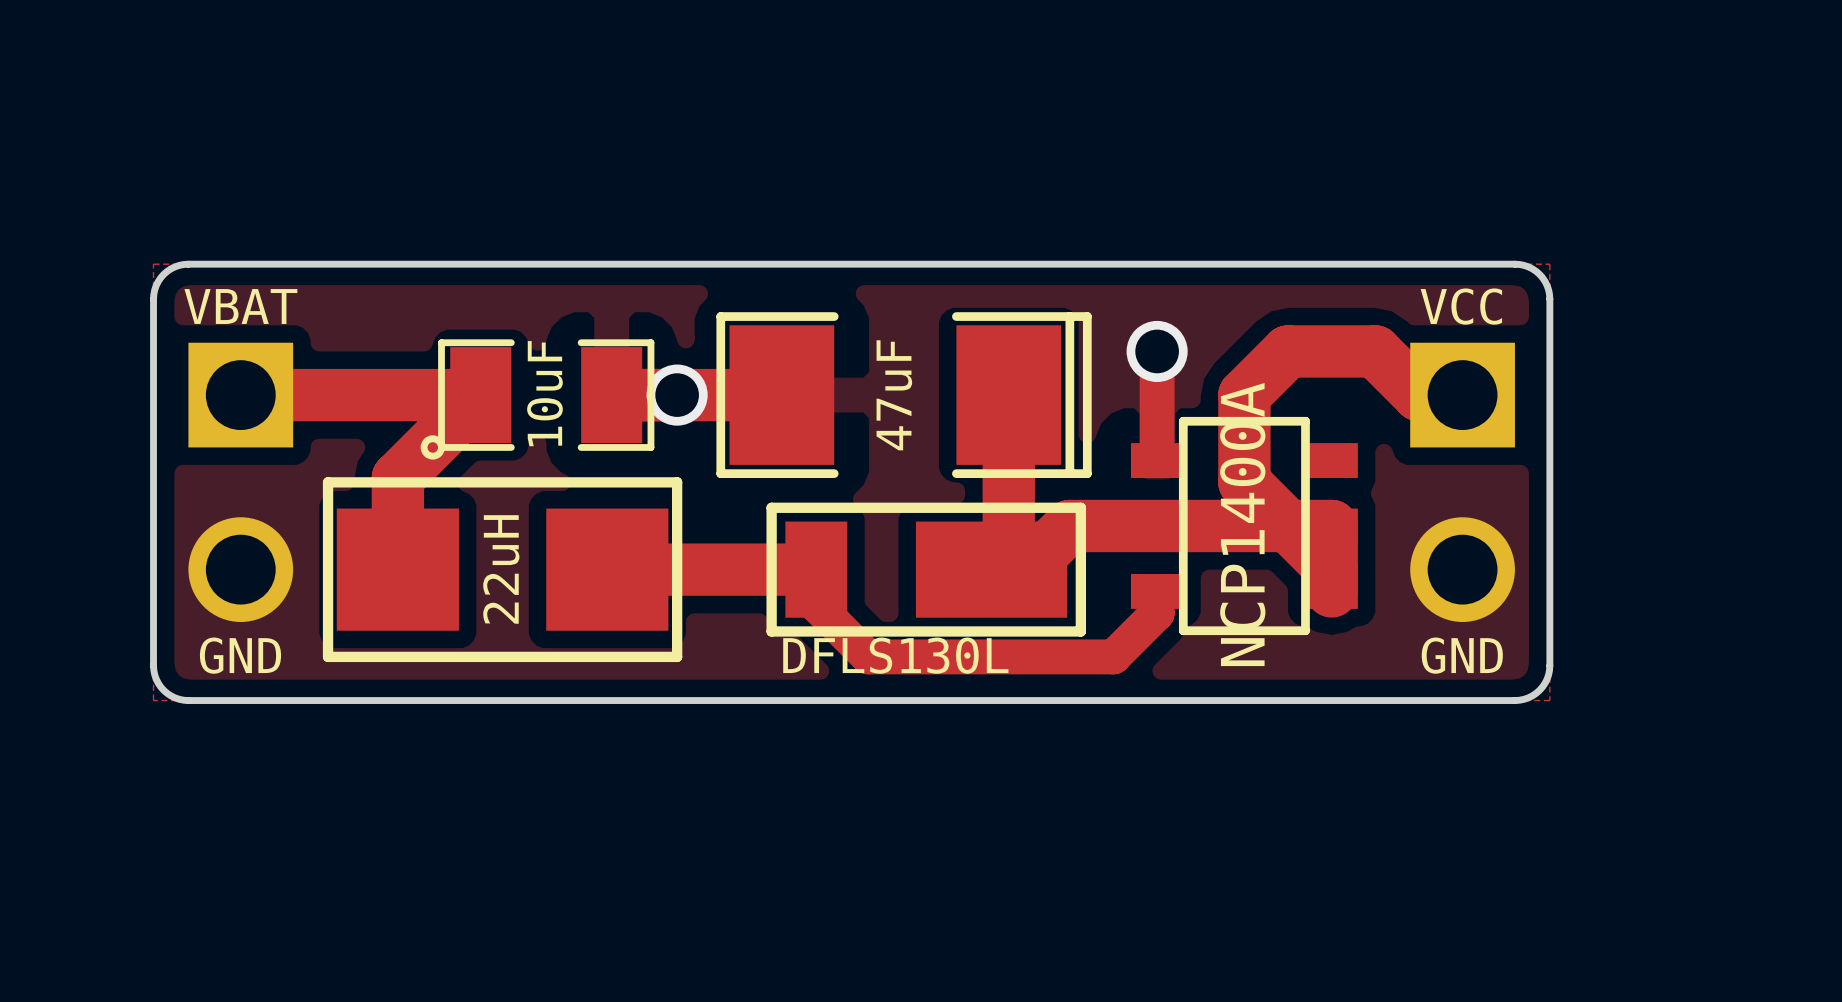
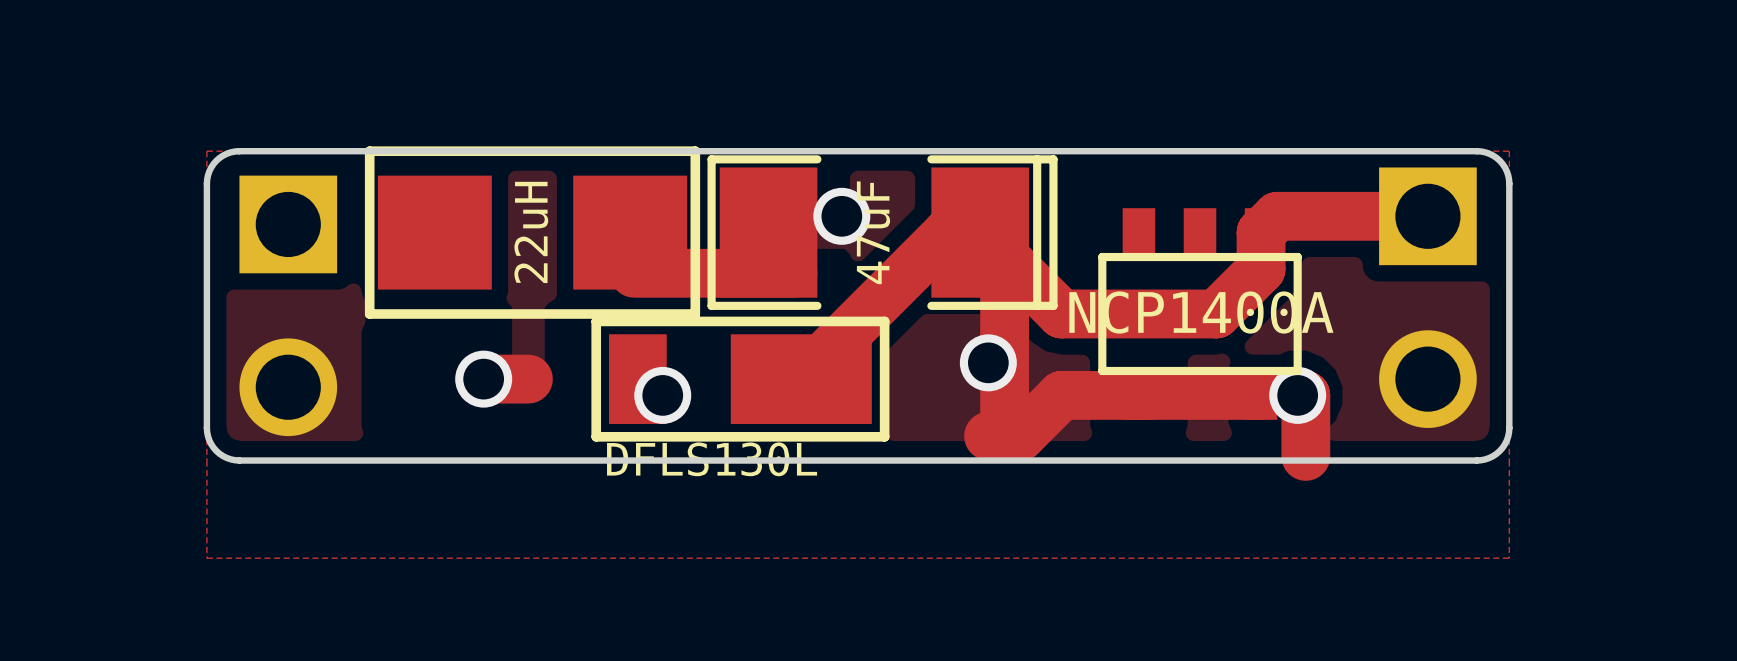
text: VBAT (240, 306) -> none
text: VCC (1461, 306) -> none
via: none -> (841, 216)
track: none -> (1427, 216) (1277, 216) (1261, 232) (1261, 269) (1216, 314) (1061, 314) (980, 232) (947, 232) (801, 379)
part footprint: [420, 339, 655, 460] -> [364, 146, 701, 319]
track: (1157, 351) (1157, 460) -> none
via: (1157, 351) -> none
part value: 10uF (544, 393) -> 22uH (531, 232)
track: (240, 395) (480, 395) (397, 478) (397, 569) -> none
via: (677, 395) -> none
part position: (904, 395) -> (882, 232)
track: (1462, 395) (1418, 395) (1375, 351) (1288, 351) (1244, 395) (1244, 482) (1331, 569) -> none
part position: (240, 482) -> (288, 305)
part position: (1462, 482) -> (1427, 297)
via: none -> (988, 362)
track: none -> (483, 379) (528, 379)
via: none -> (483, 379)
via: none -> (662, 395)
part rotation: 0° (1244, 526) -> 90° counterclockwise (1200, 314)
via: none -> (1297, 395)
board edge: (153, 560) (154, 674) (158, 683) (167, 693) (175, 697) (188, 700) (1519, 700) (1532, 695) (1539, 690) (1548, 674) (1549, 560) -> (206, 427) (209, 440) (216, 450) (227, 458) (239, 460) (1476, 460) (1489, 458) (1499, 450) (1506, 440) (1509, 427)
part: 22uH (502, 569) -> none
track: (607, 569) (816, 569) (816, 605) (868, 656) (1113, 656) (1157, 613) (1157, 591) -> none
part position: (926, 569) -> (740, 379)
text: GND (240, 655) -> none
text: GND (1462, 655) -> none

